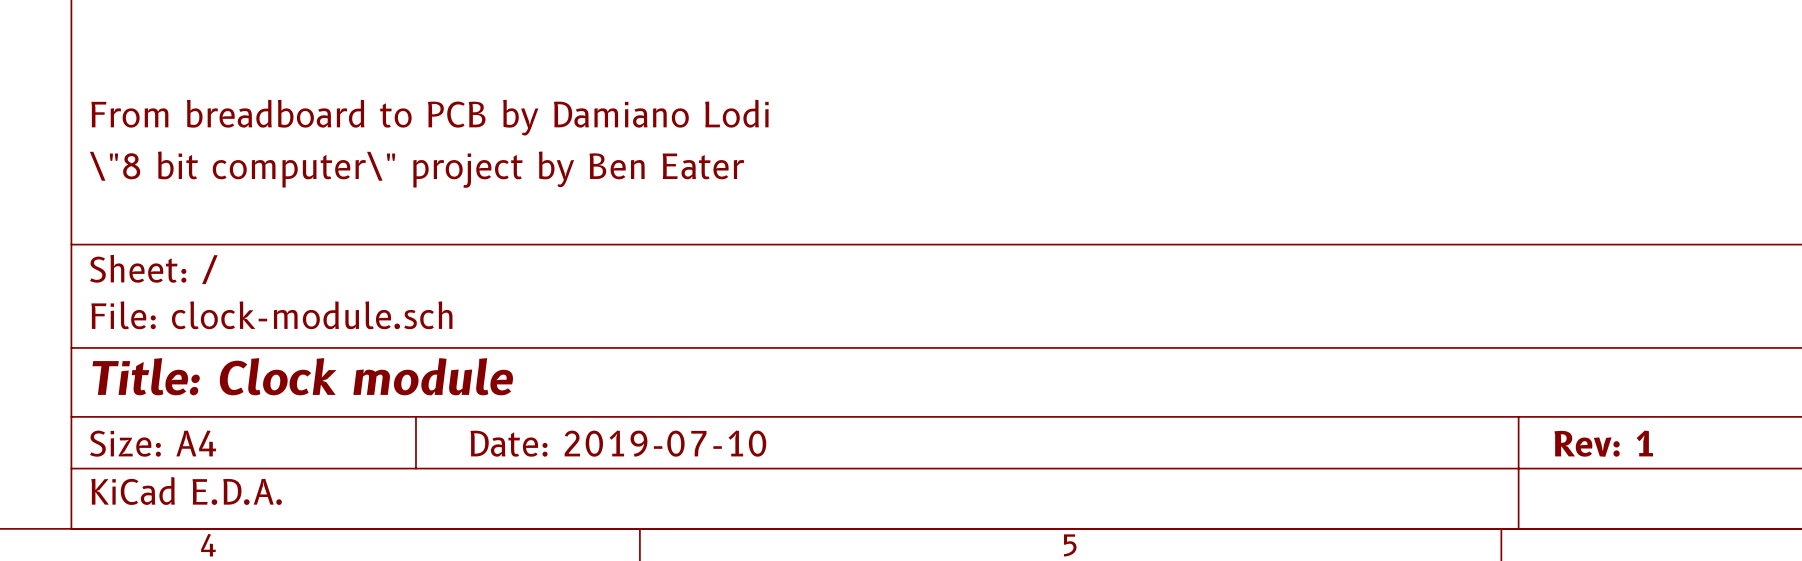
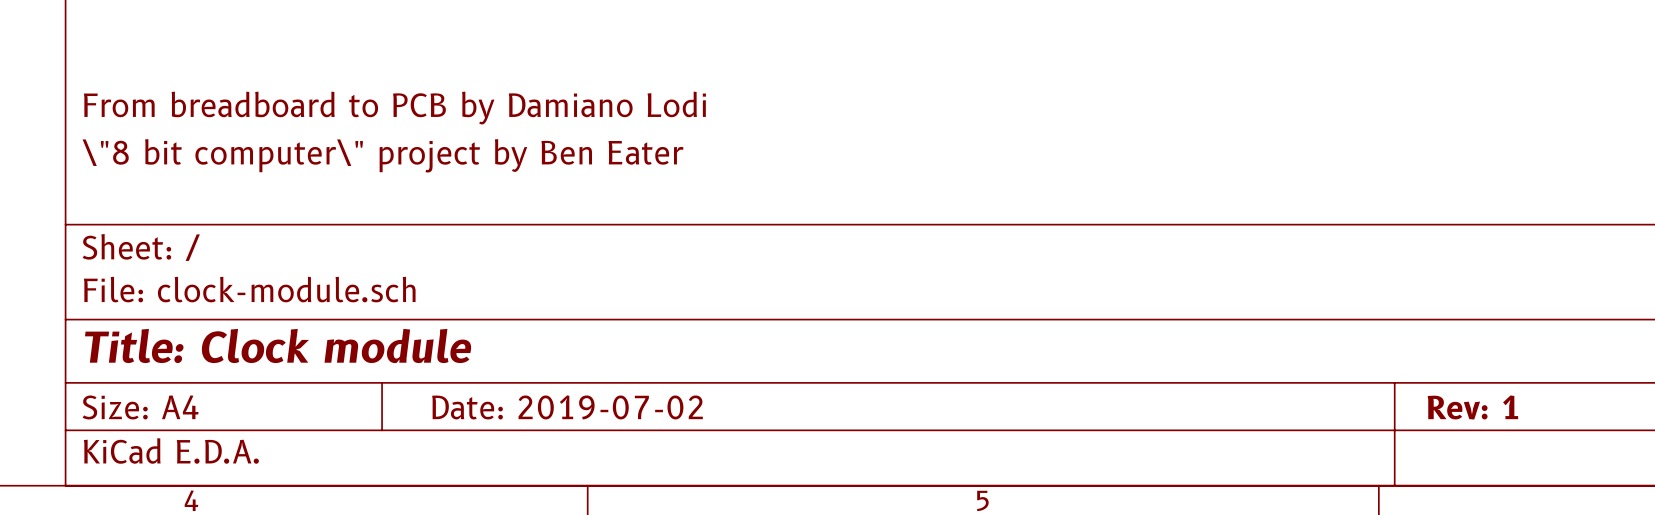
title block: Date: 2019-07-10 (618, 443) -> Date: 2019-07-02 (567, 407)

